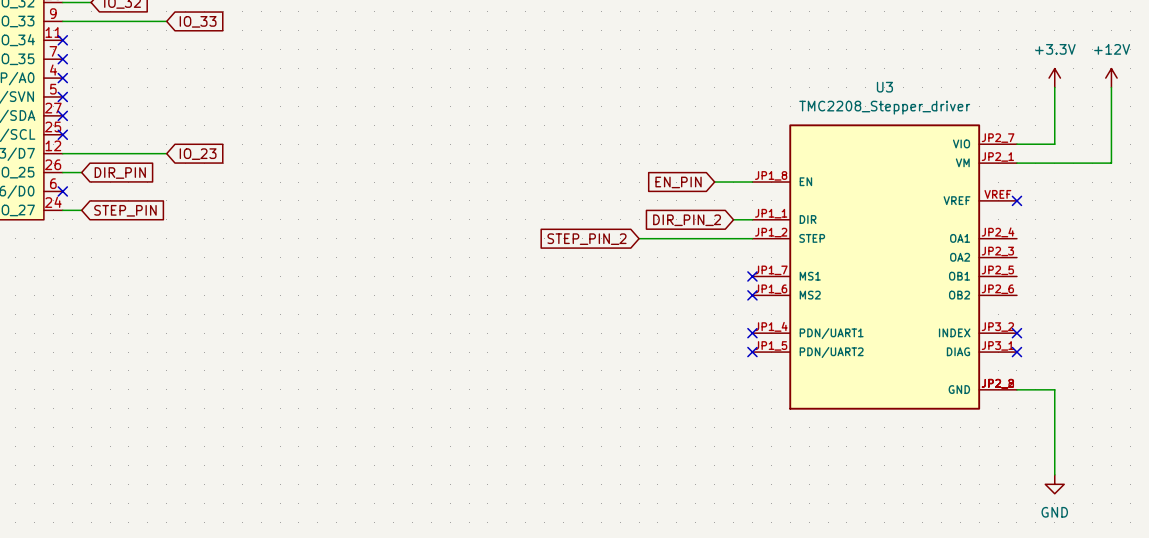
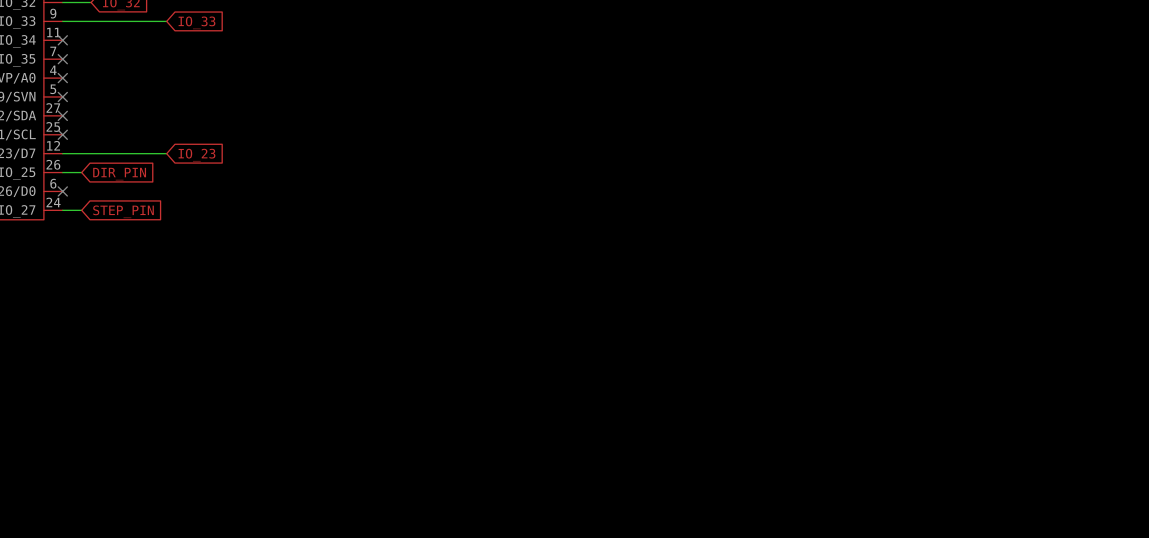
power symbol: +3.3V (1054, 78) -> none
power symbol: +12V (1111, 78) -> none
wire: (1054, 87) (1054, 144) (1016, 144) -> none
wire: (1111, 87) (1111, 163) (1016, 163) -> none
global label: EN_PIN (678, 182) -> none
wire: (714, 182) (752, 182) -> none
no-connect mark: (1016, 200) -> none
wire: (733, 219) (752, 219) -> none
global label: DIR_PIN_2 (687, 220) -> none
wire: (639, 238) (752, 238) -> none
global label: STEP_PIN_2 (586, 239) -> none
U3: TMC2208_Stepper_driver (884, 267) -> none
no-connect mark: (752, 276) -> none
no-connect mark: (752, 295) -> none
no-connect mark: (752, 333) -> none
no-connect mark: (1016, 333) -> none
no-connect mark: (752, 352) -> none
no-connect mark: (1016, 352) -> none
wire: (1016, 389) (1054, 389) (1054, 474) -> none
power symbol: GND (1054, 484) -> none

